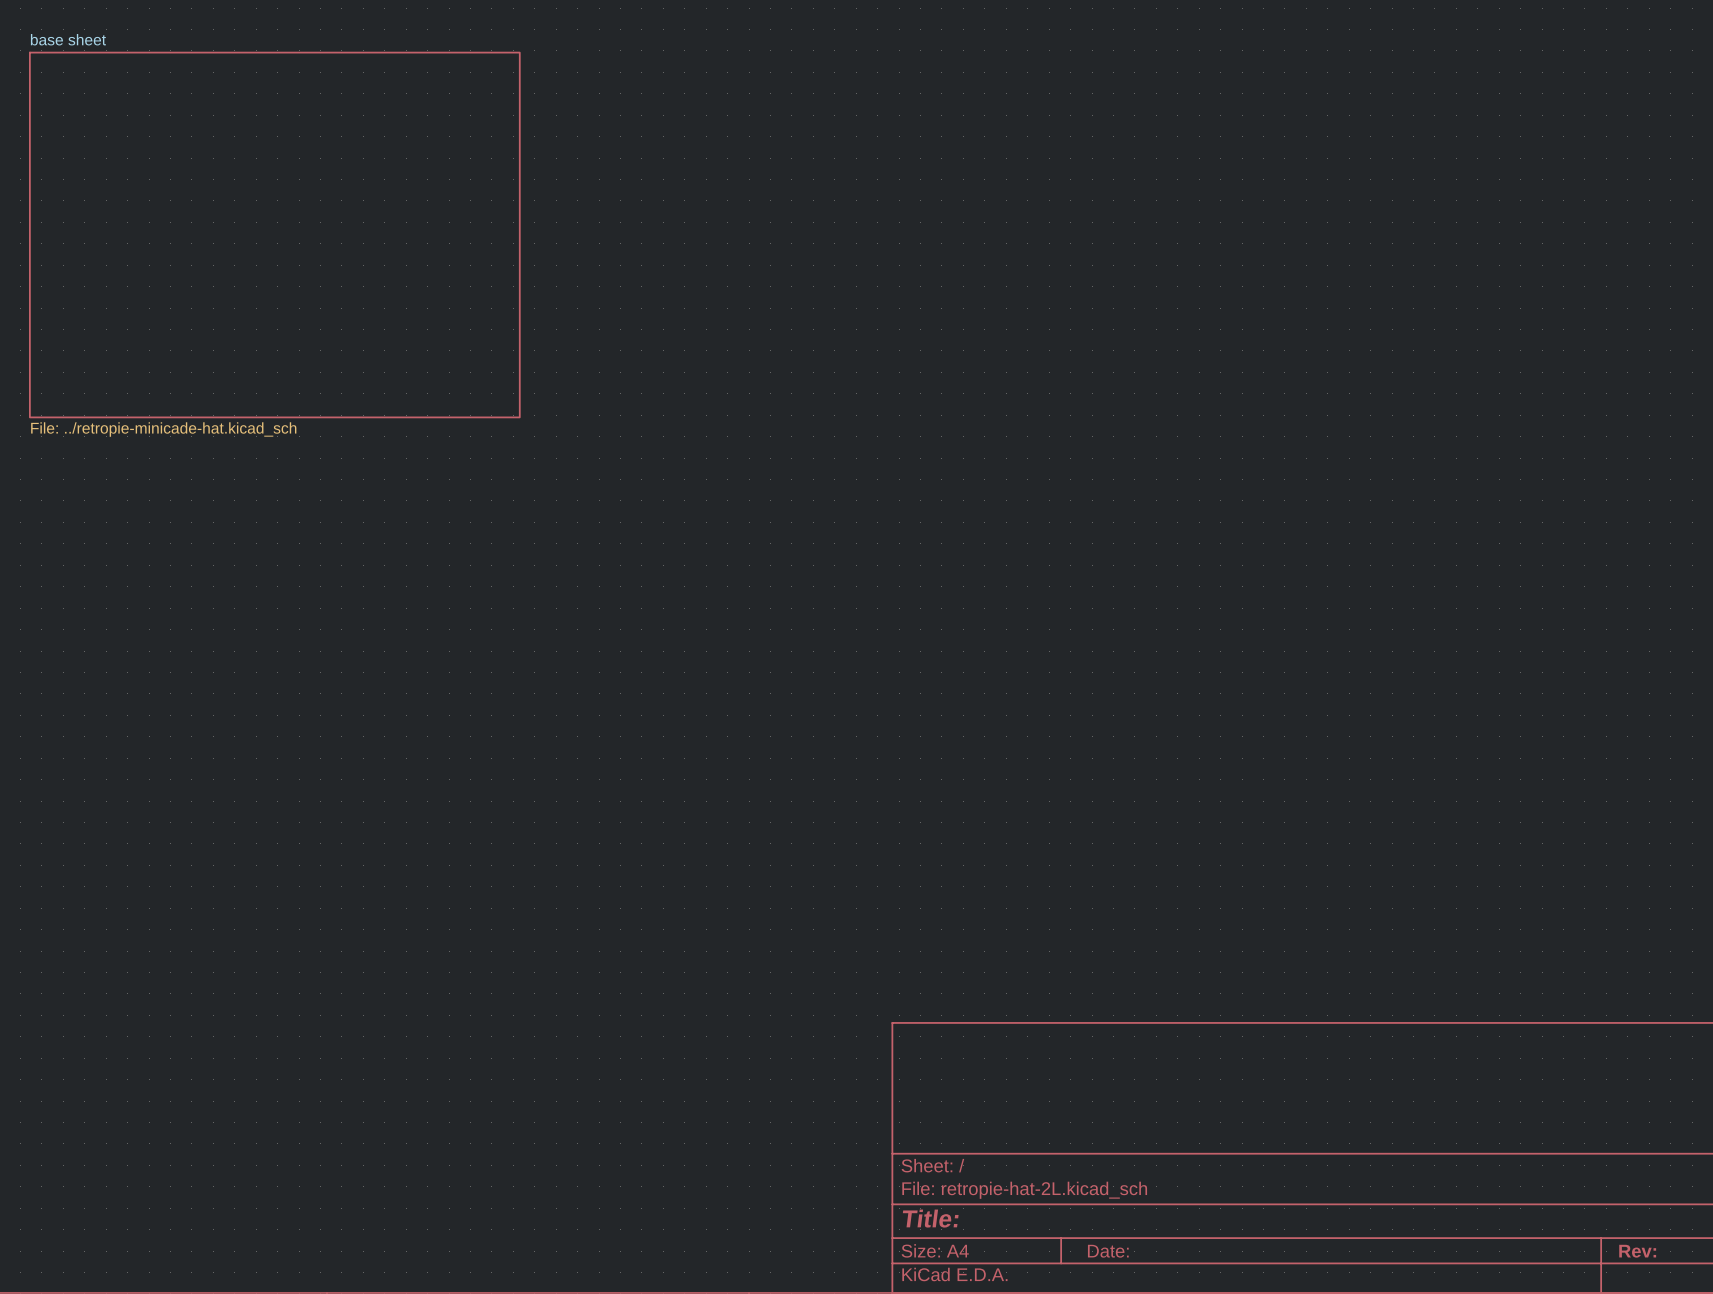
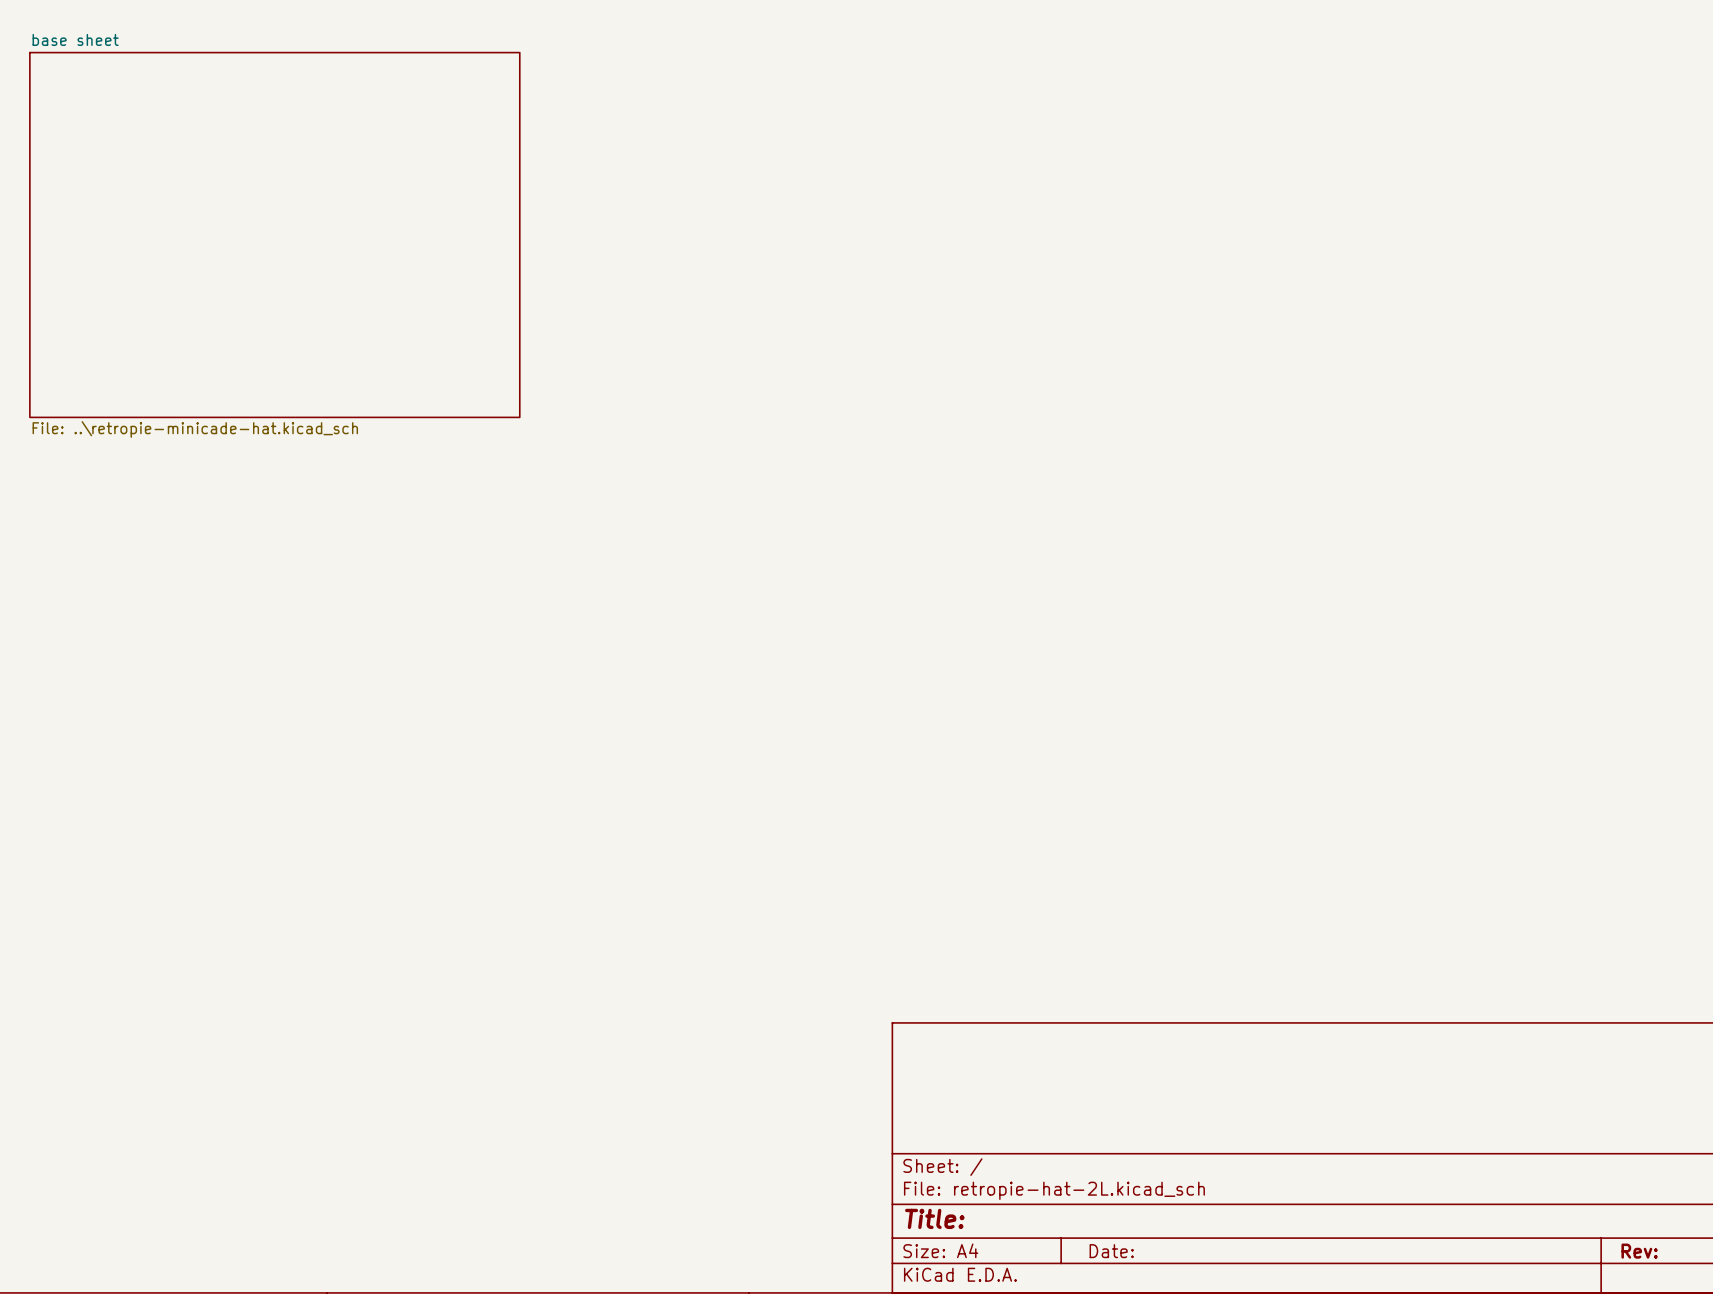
sheet base sheet value: File: ../retropie-minicade-hat.kicad_sch (163, 429) -> File: ..\retropie-minicade-hat.kicad_sch (195, 429)

